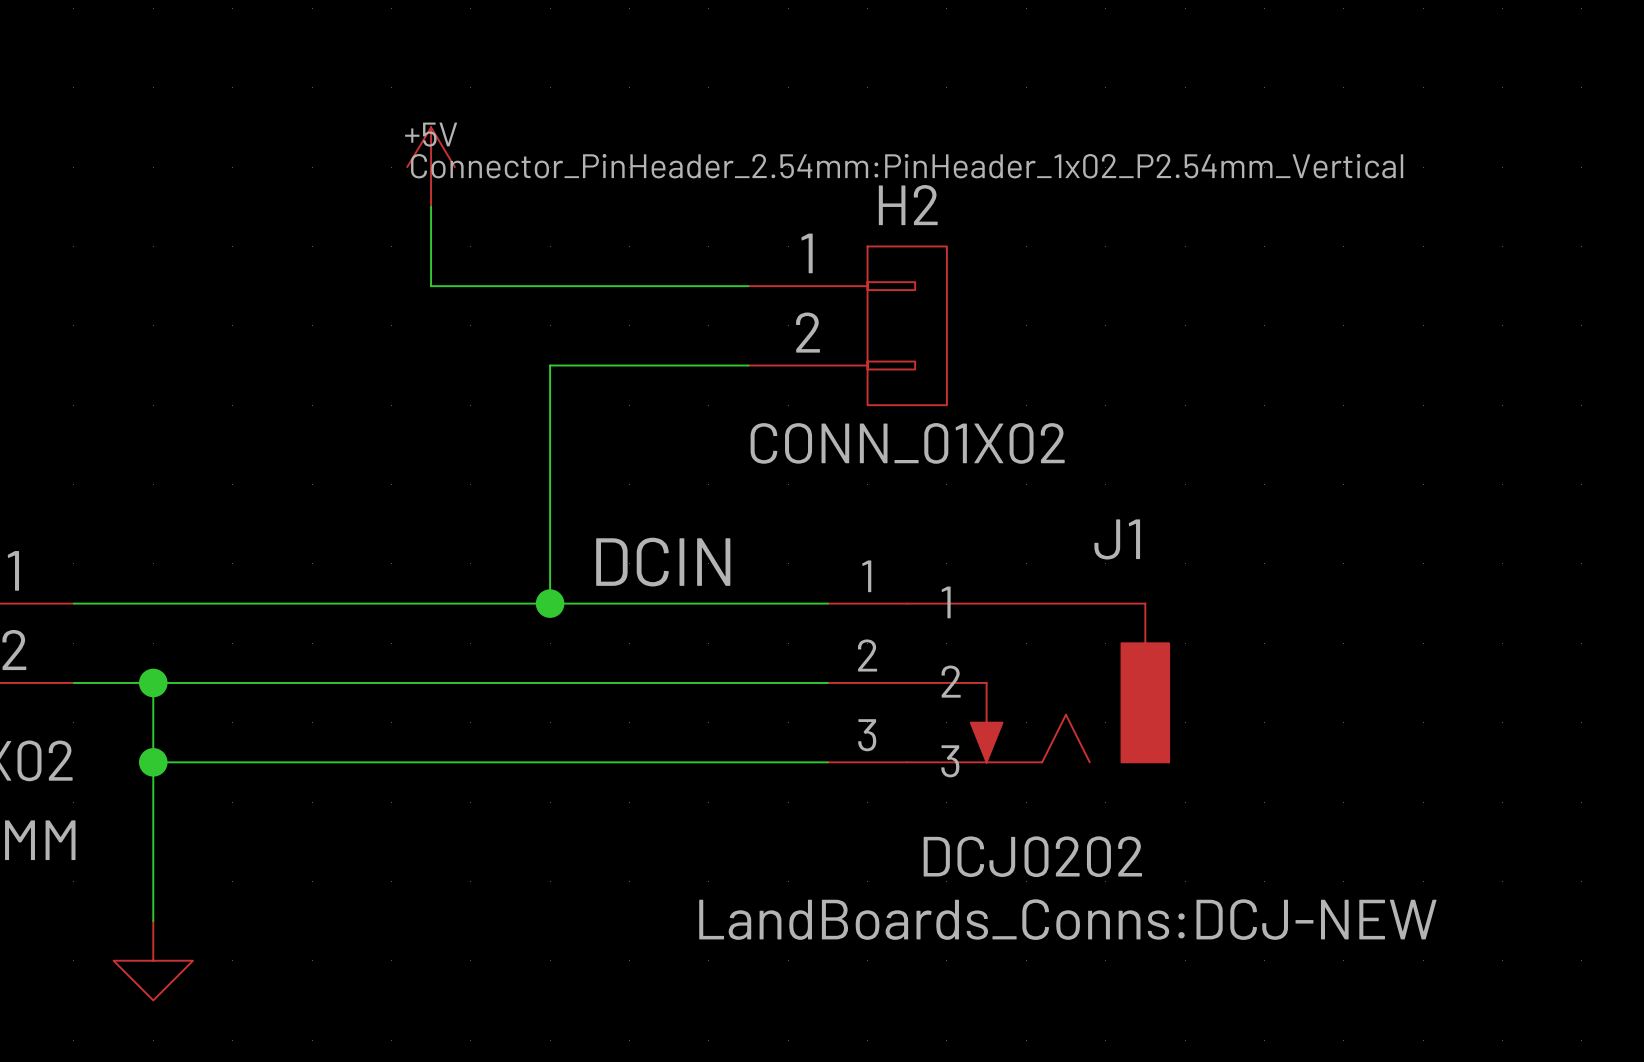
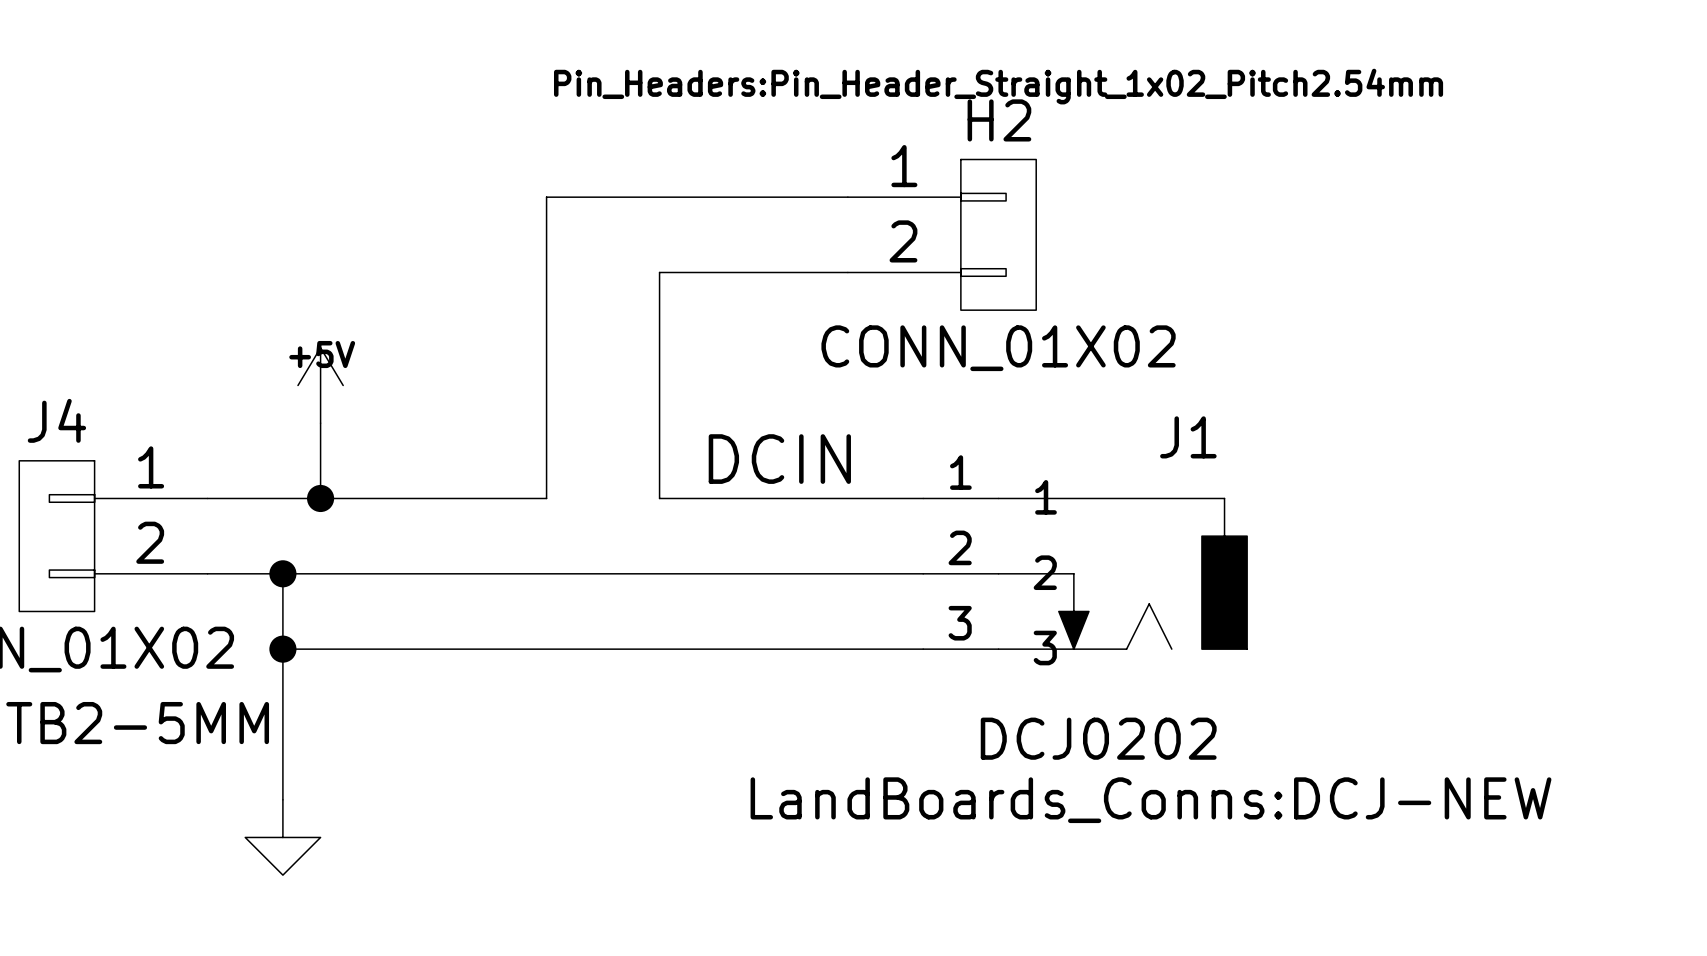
H2 text: Connector_PinHeader_2.54mm:PinHeader_1x02_P2.54mm_Vertical (907, 166) -> Pin_Headers:Pin_Header_Straight_1x02_Pitch2.54mm (998, 86)
power symbol position: +5V (431, 167) -> +5V (320, 385)
wire: (431, 206) (431, 286) -> (320, 423) (320, 498)
junction: none -> (320, 498)
wire: (431, 603) (550, 603) -> (546, 498) (546, 197)
junction: (550, 603) -> none

